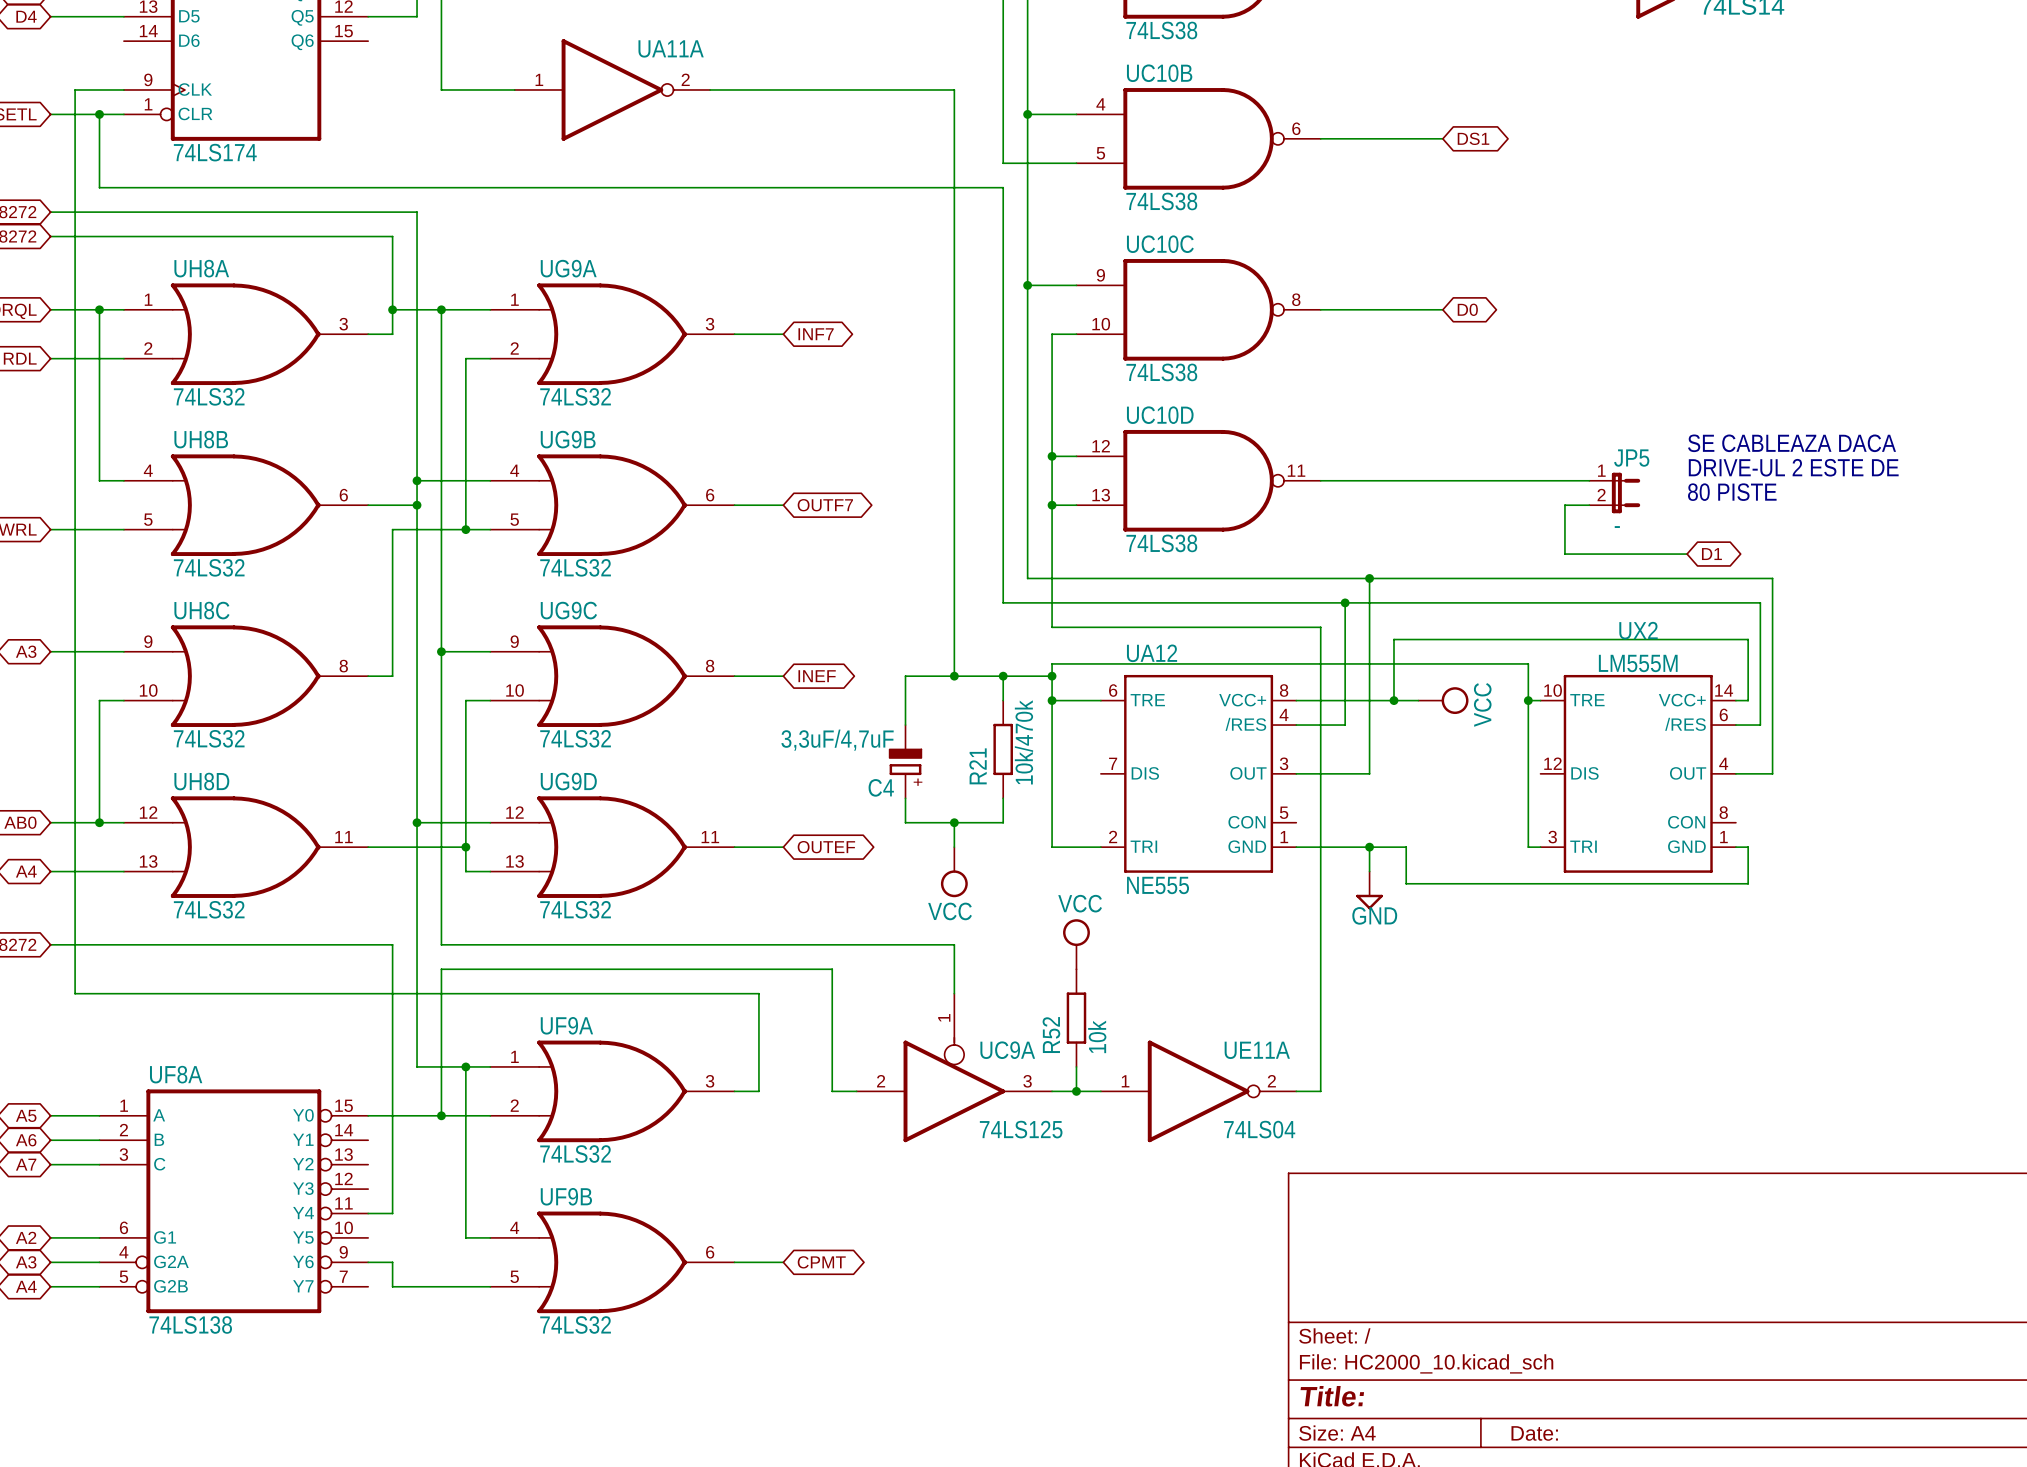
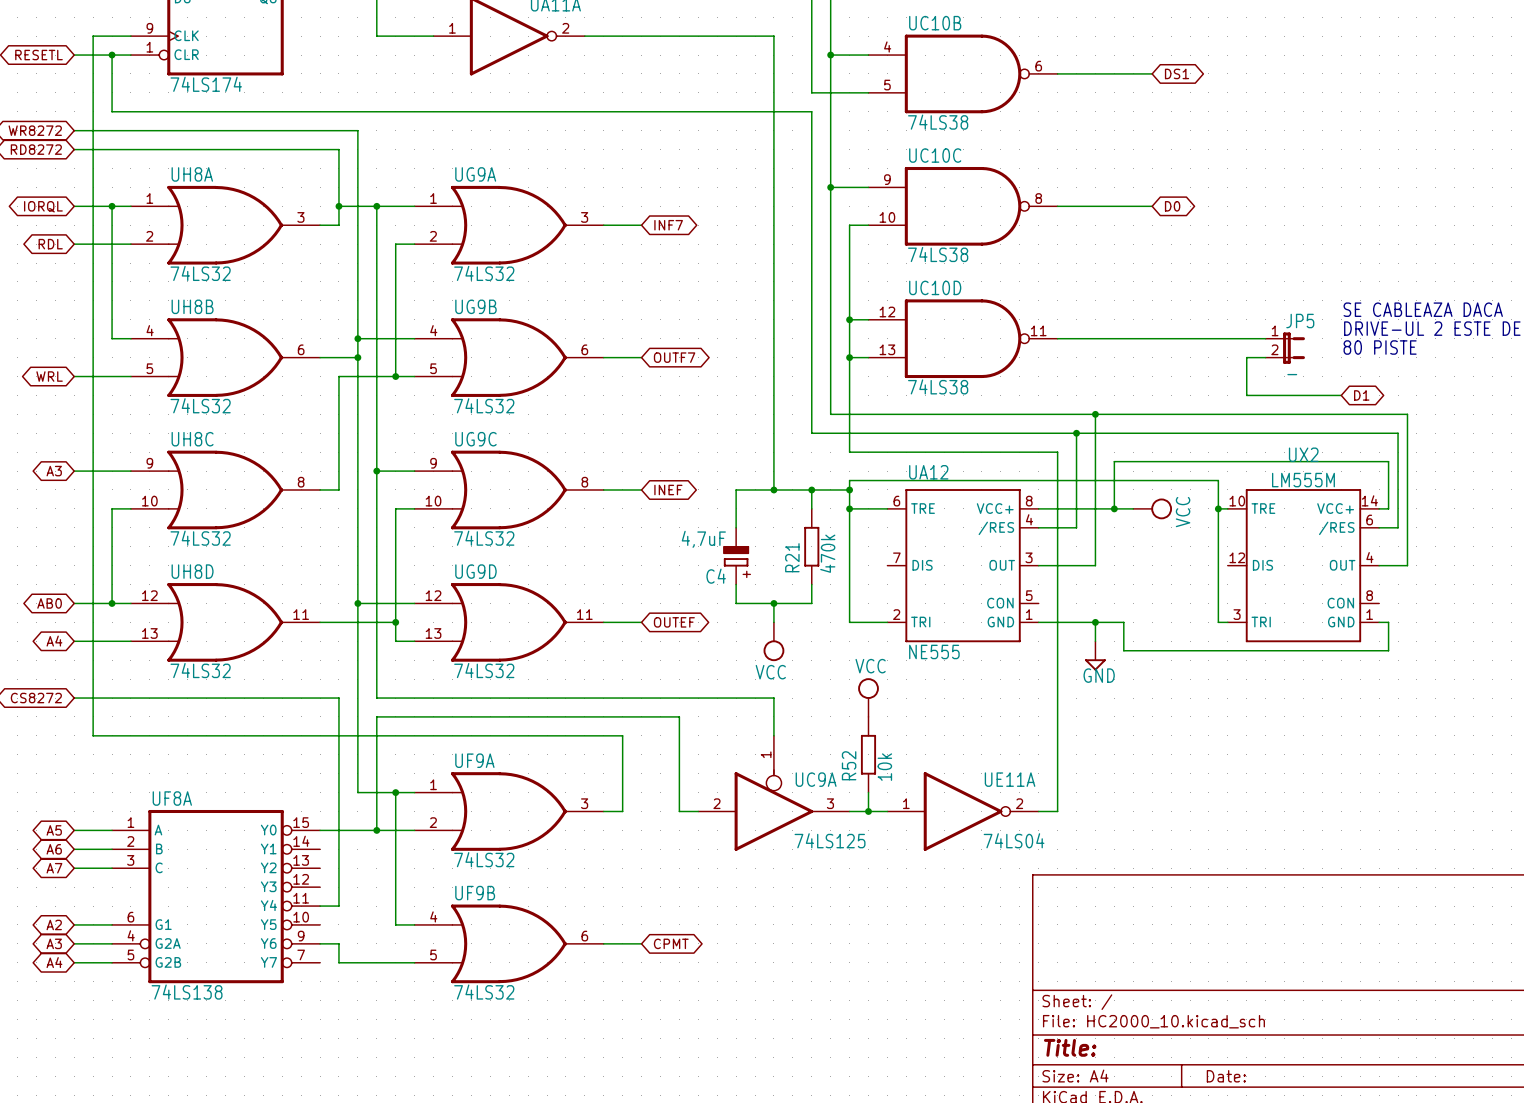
C4 value: 3,3uF/4,7uF (837, 740) -> 4,7uF (703, 539)
R21 value: 10k/470k (1023, 742) -> 470k (827, 553)

